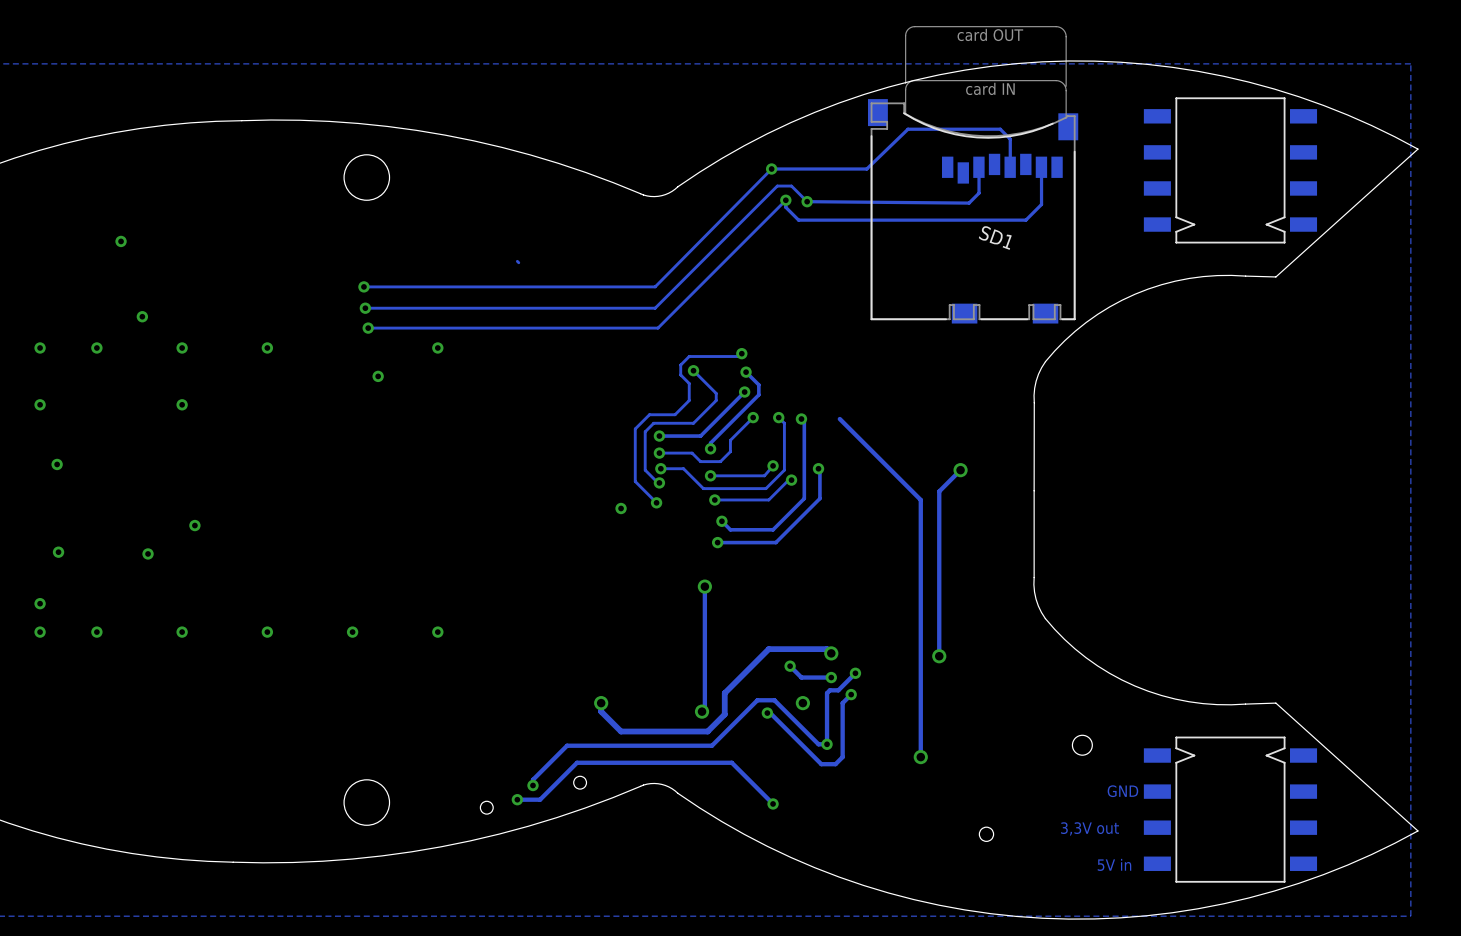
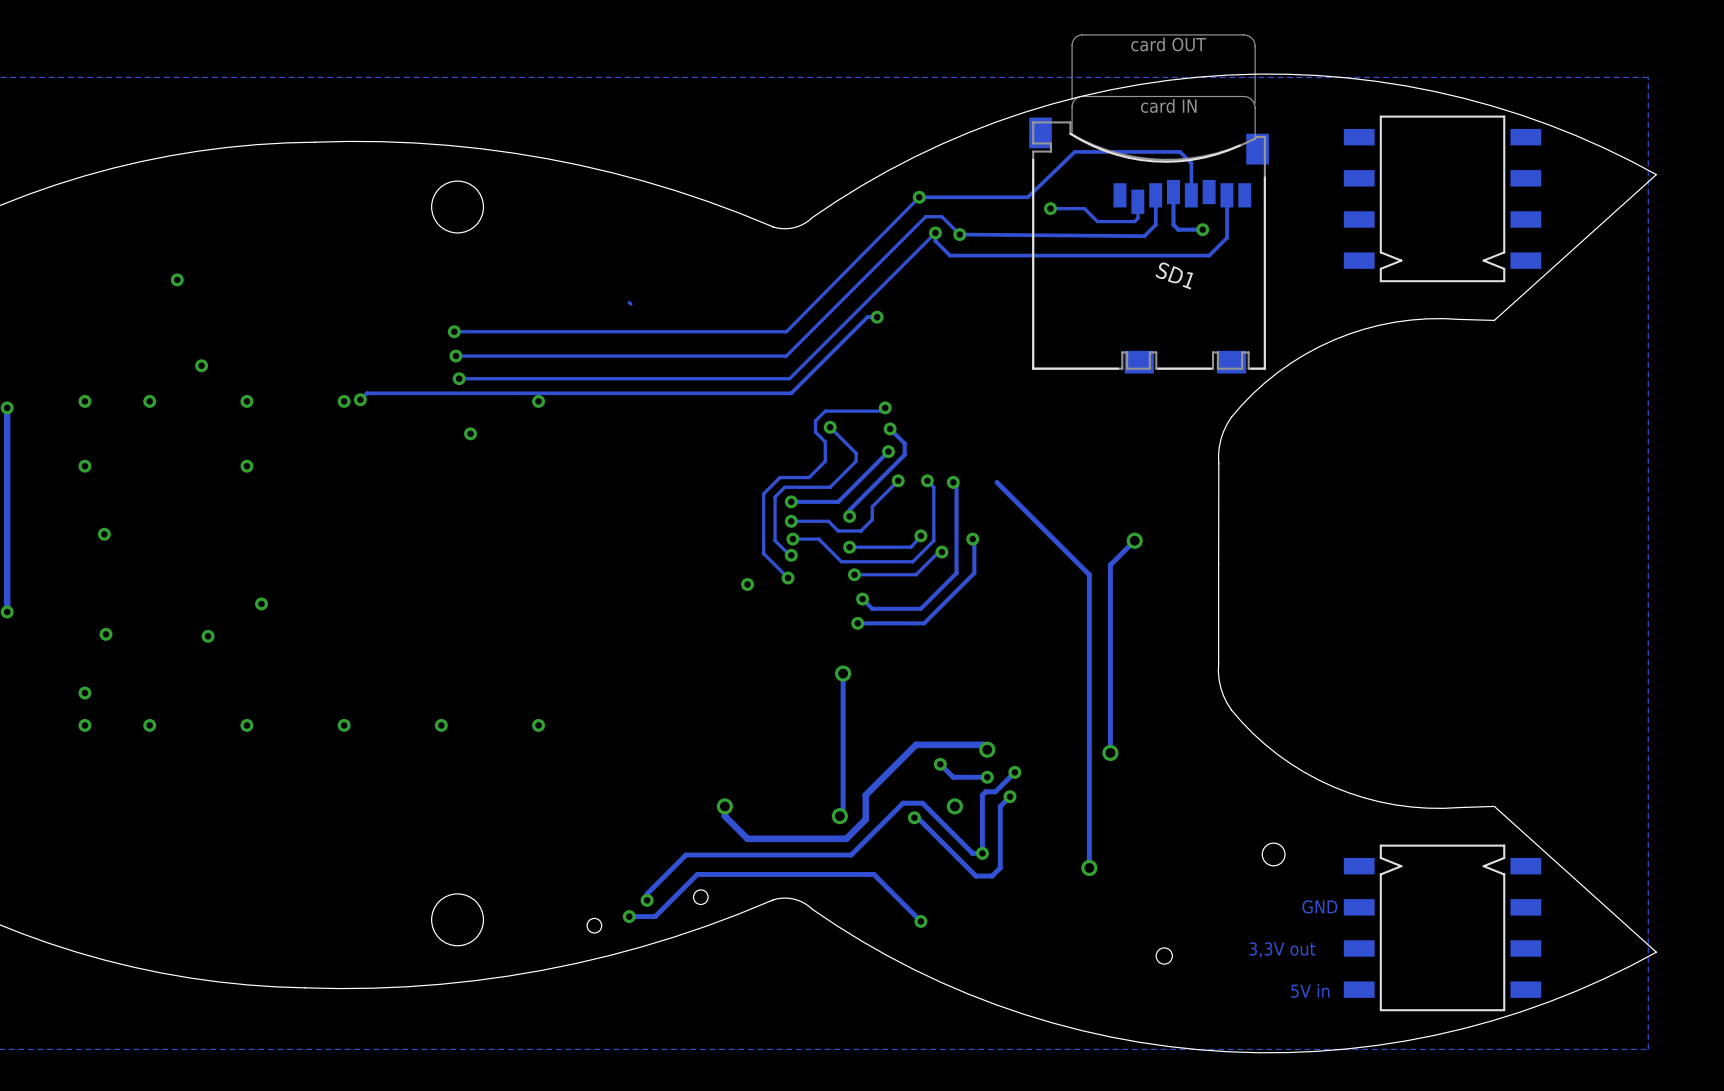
track: none -> (1173, 192) (1173, 224) (1178, 229) (1202, 229)
track: none -> (1137, 201) (1137, 218) (1134, 221) (1097, 221) (1084, 208) (1050, 208)
via: none -> (1050, 208)
via: none -> (1202, 229)
track: none -> (877, 317) (867, 317) (791, 393) (366, 393) (360, 399)
via: none -> (877, 317)
via: none -> (360, 399)

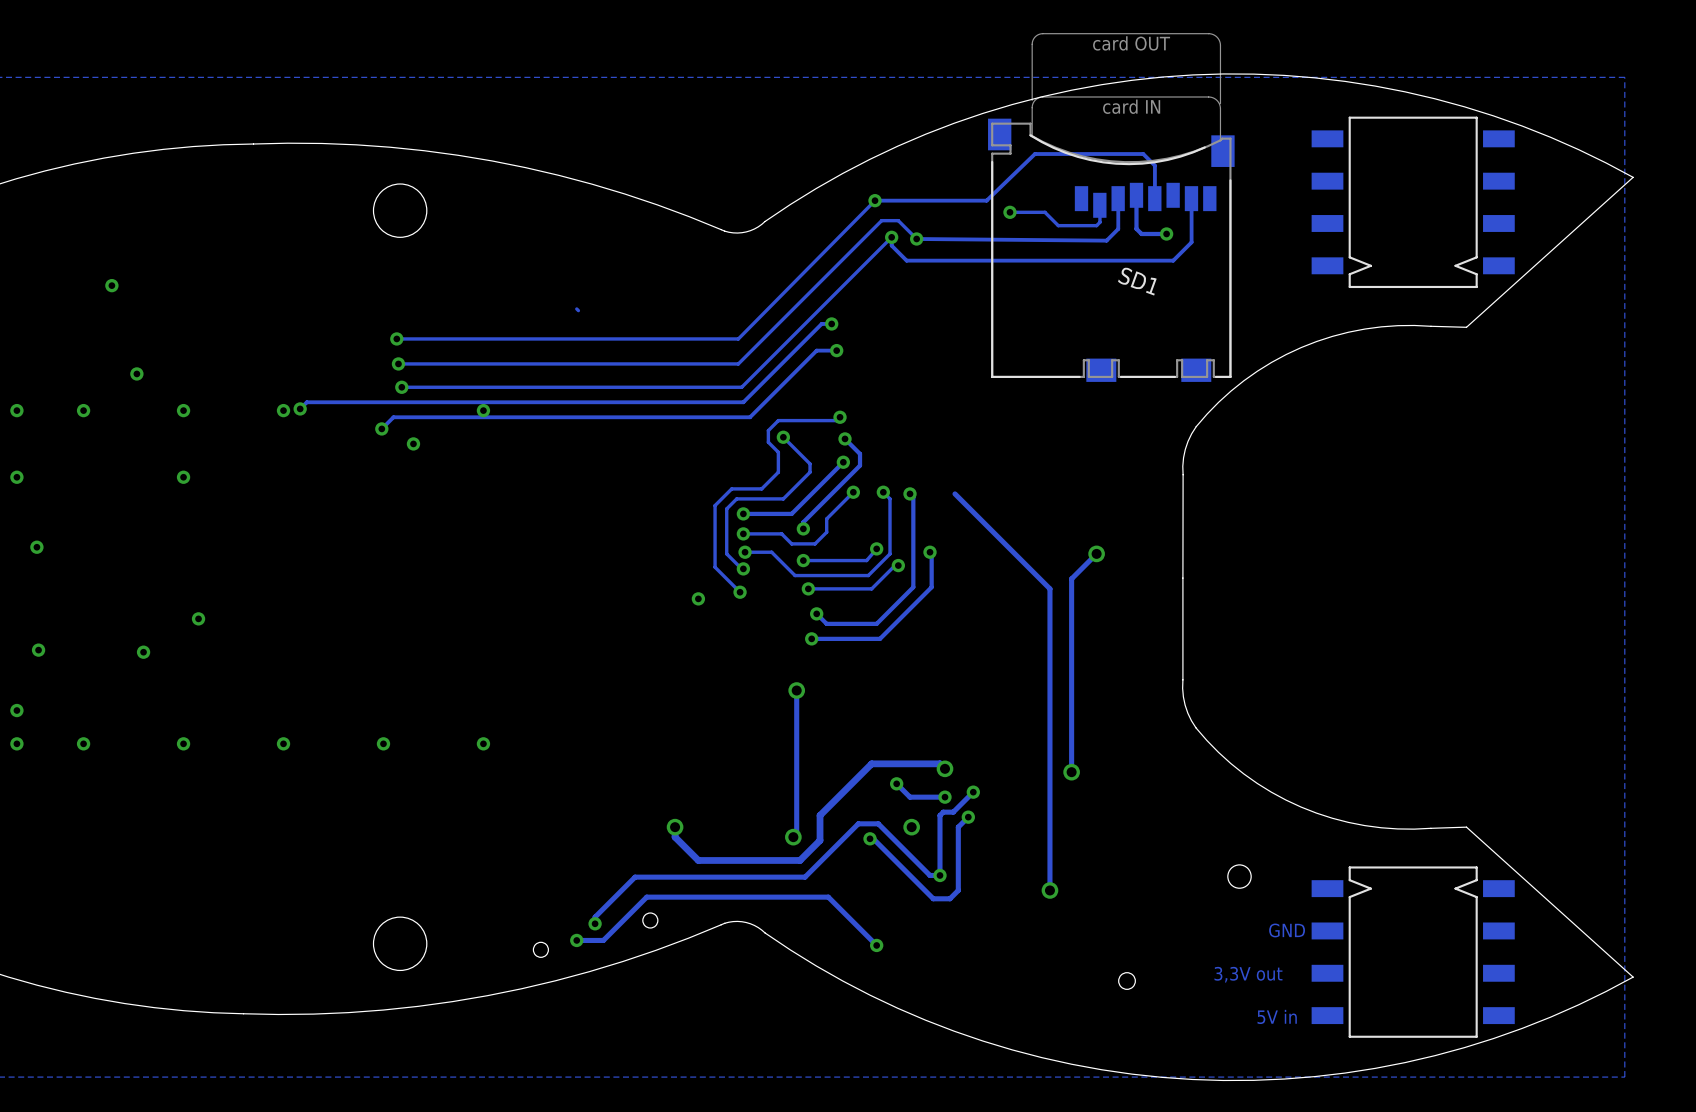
track: none -> (836, 350) (816, 350) (750, 417) (393, 417) (381, 428)
via: none -> (836, 350)
via: none -> (381, 428)

